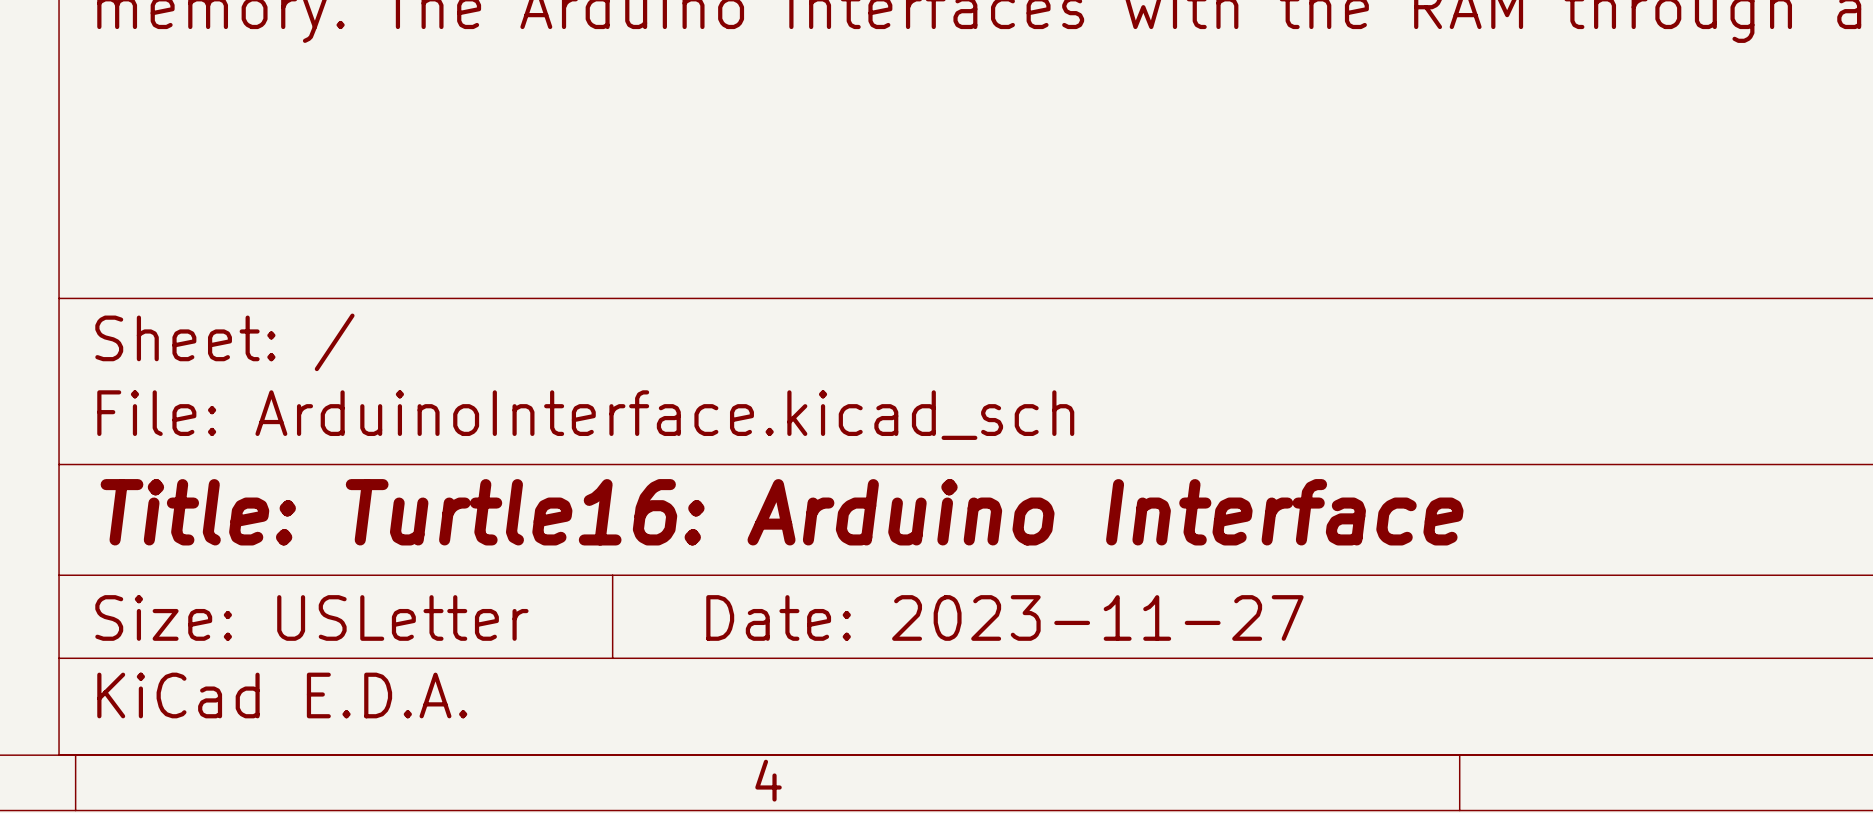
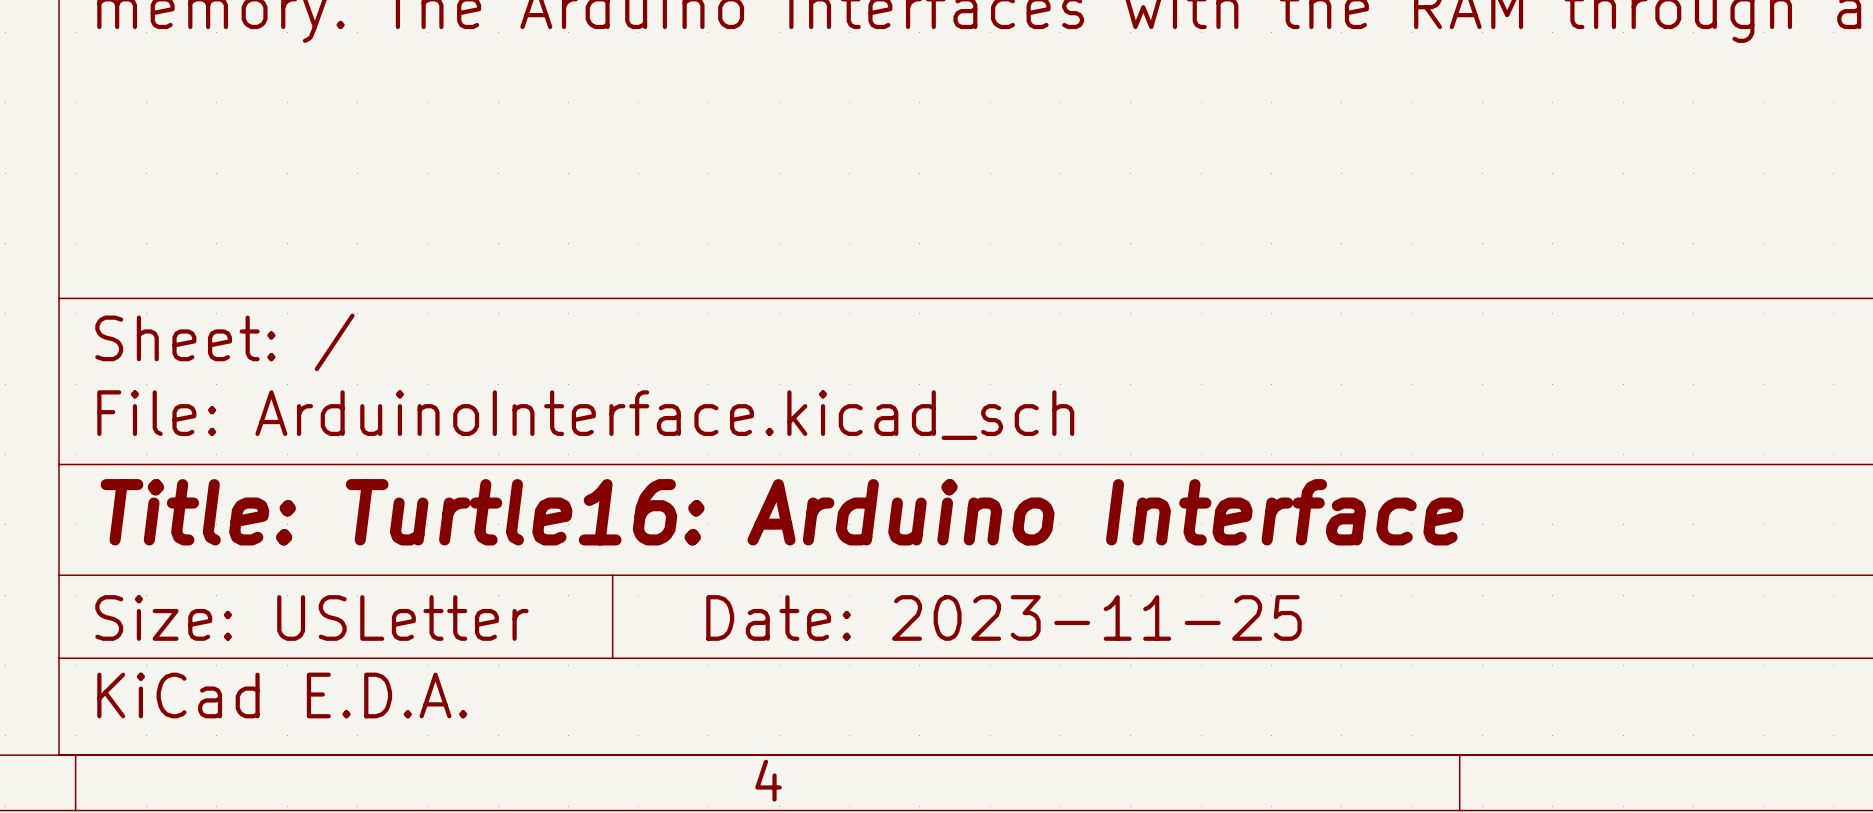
title block: Date: 2023-11-27 (1004, 617) -> Date: 2023-11-25 (1003, 617)

